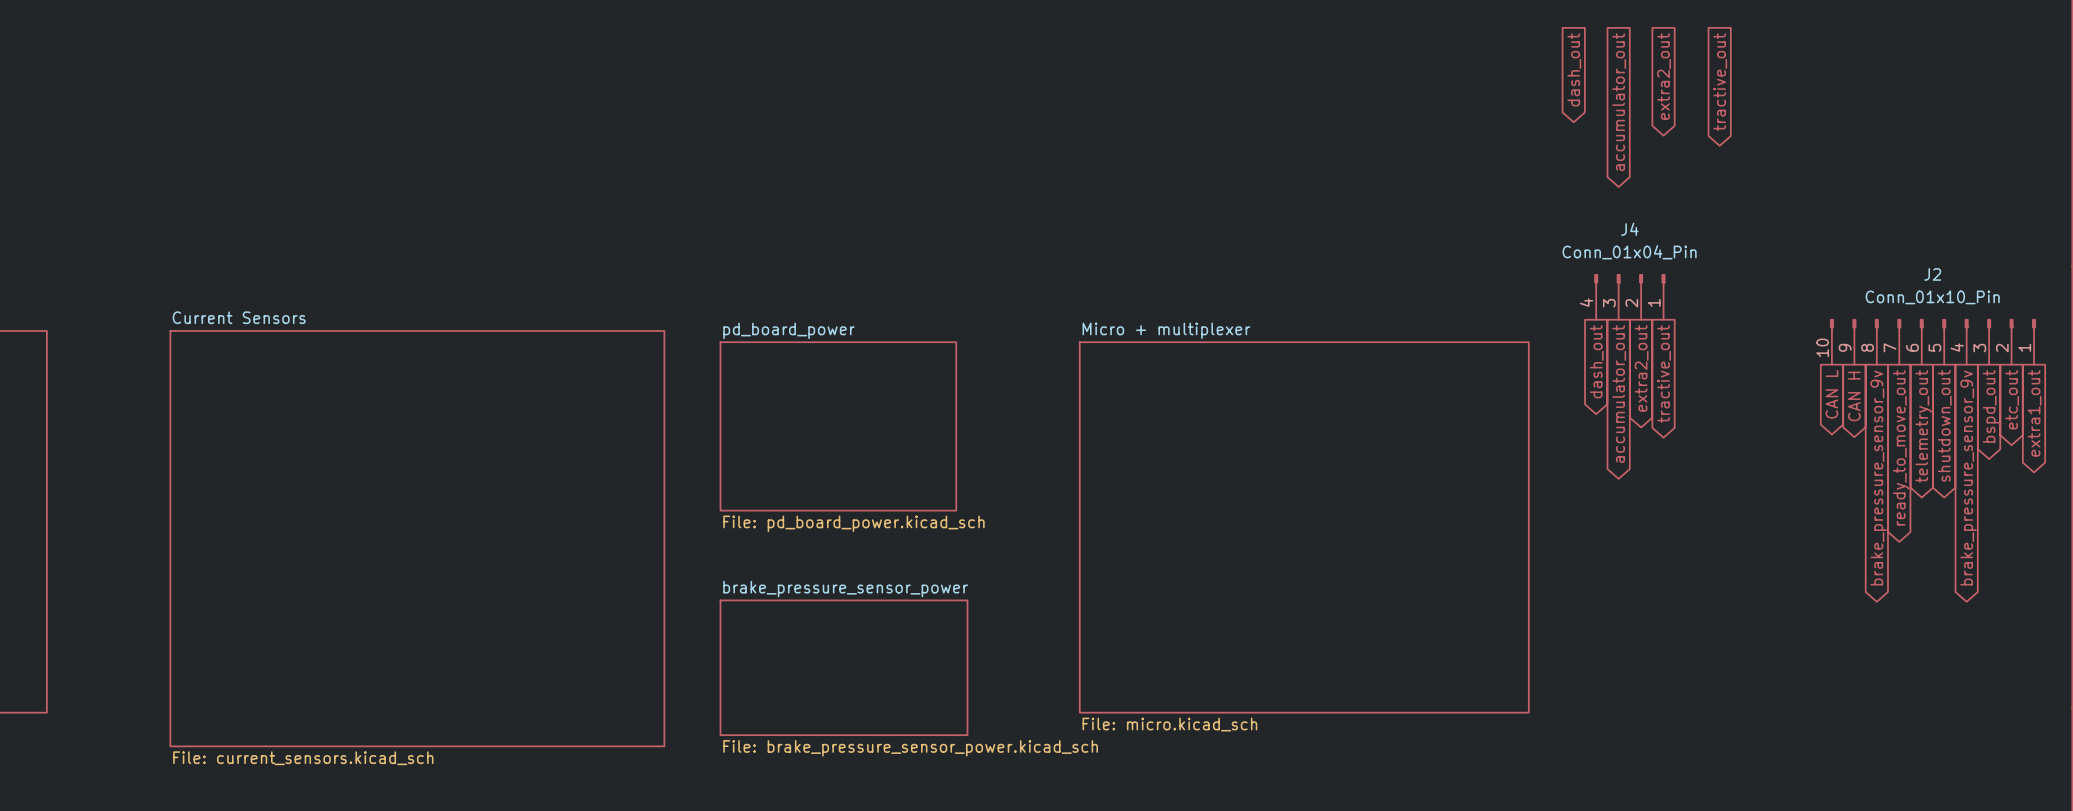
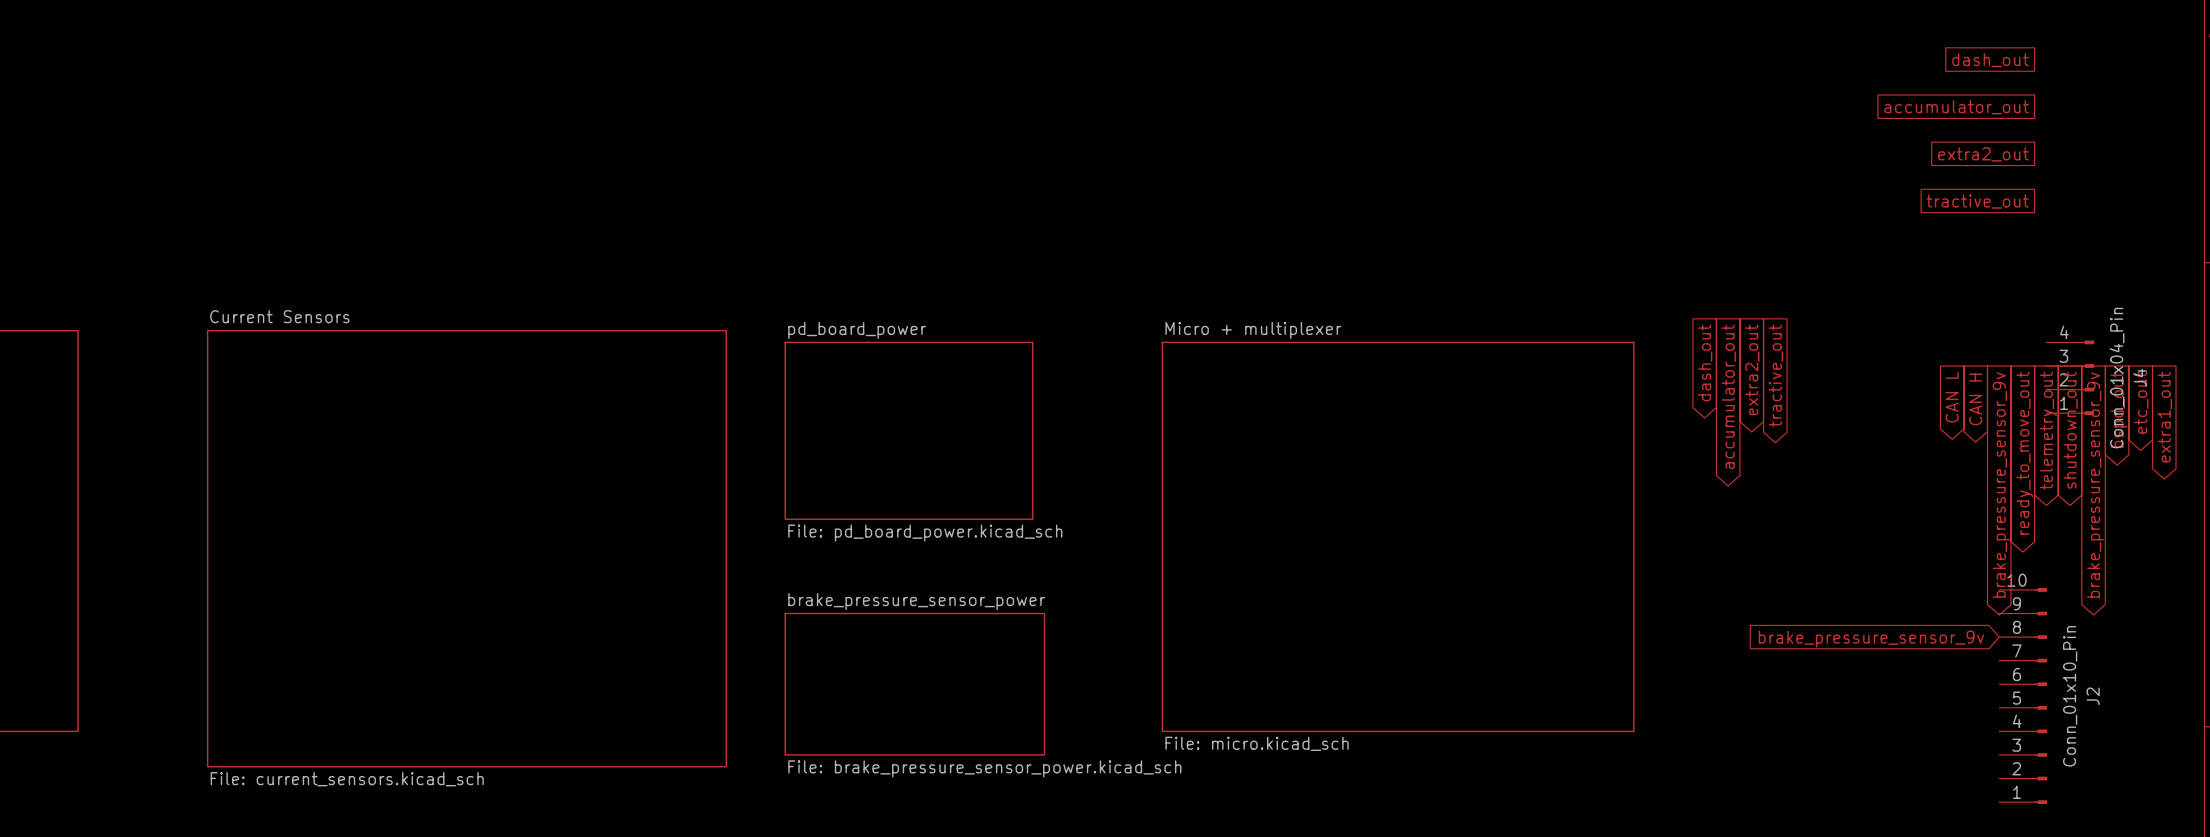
global label: dash_out (1574, 69) -> none
global label: none -> dash_out (1990, 60)
global label: extra2_out (1664, 76) -> none
global label: tractive_out (1720, 82) -> none
global label: accumulator_out (1619, 102) -> none
global label: none -> accumulator_out (1956, 107)
global label: none -> extra2_out (1983, 154)
global label: none -> tractive_out (1977, 201)
J4 rotation: 0° (1629, 280) -> 90° clockwise (2087, 377)
J4 position: (1629, 296) -> (2070, 377)
J2 rotation: 0° (1932, 325) -> 90° clockwise (2040, 696)
J2 position: (1932, 341) -> (2023, 696)
global label: none -> brake_pressure_sensor_9v (1871, 639)

